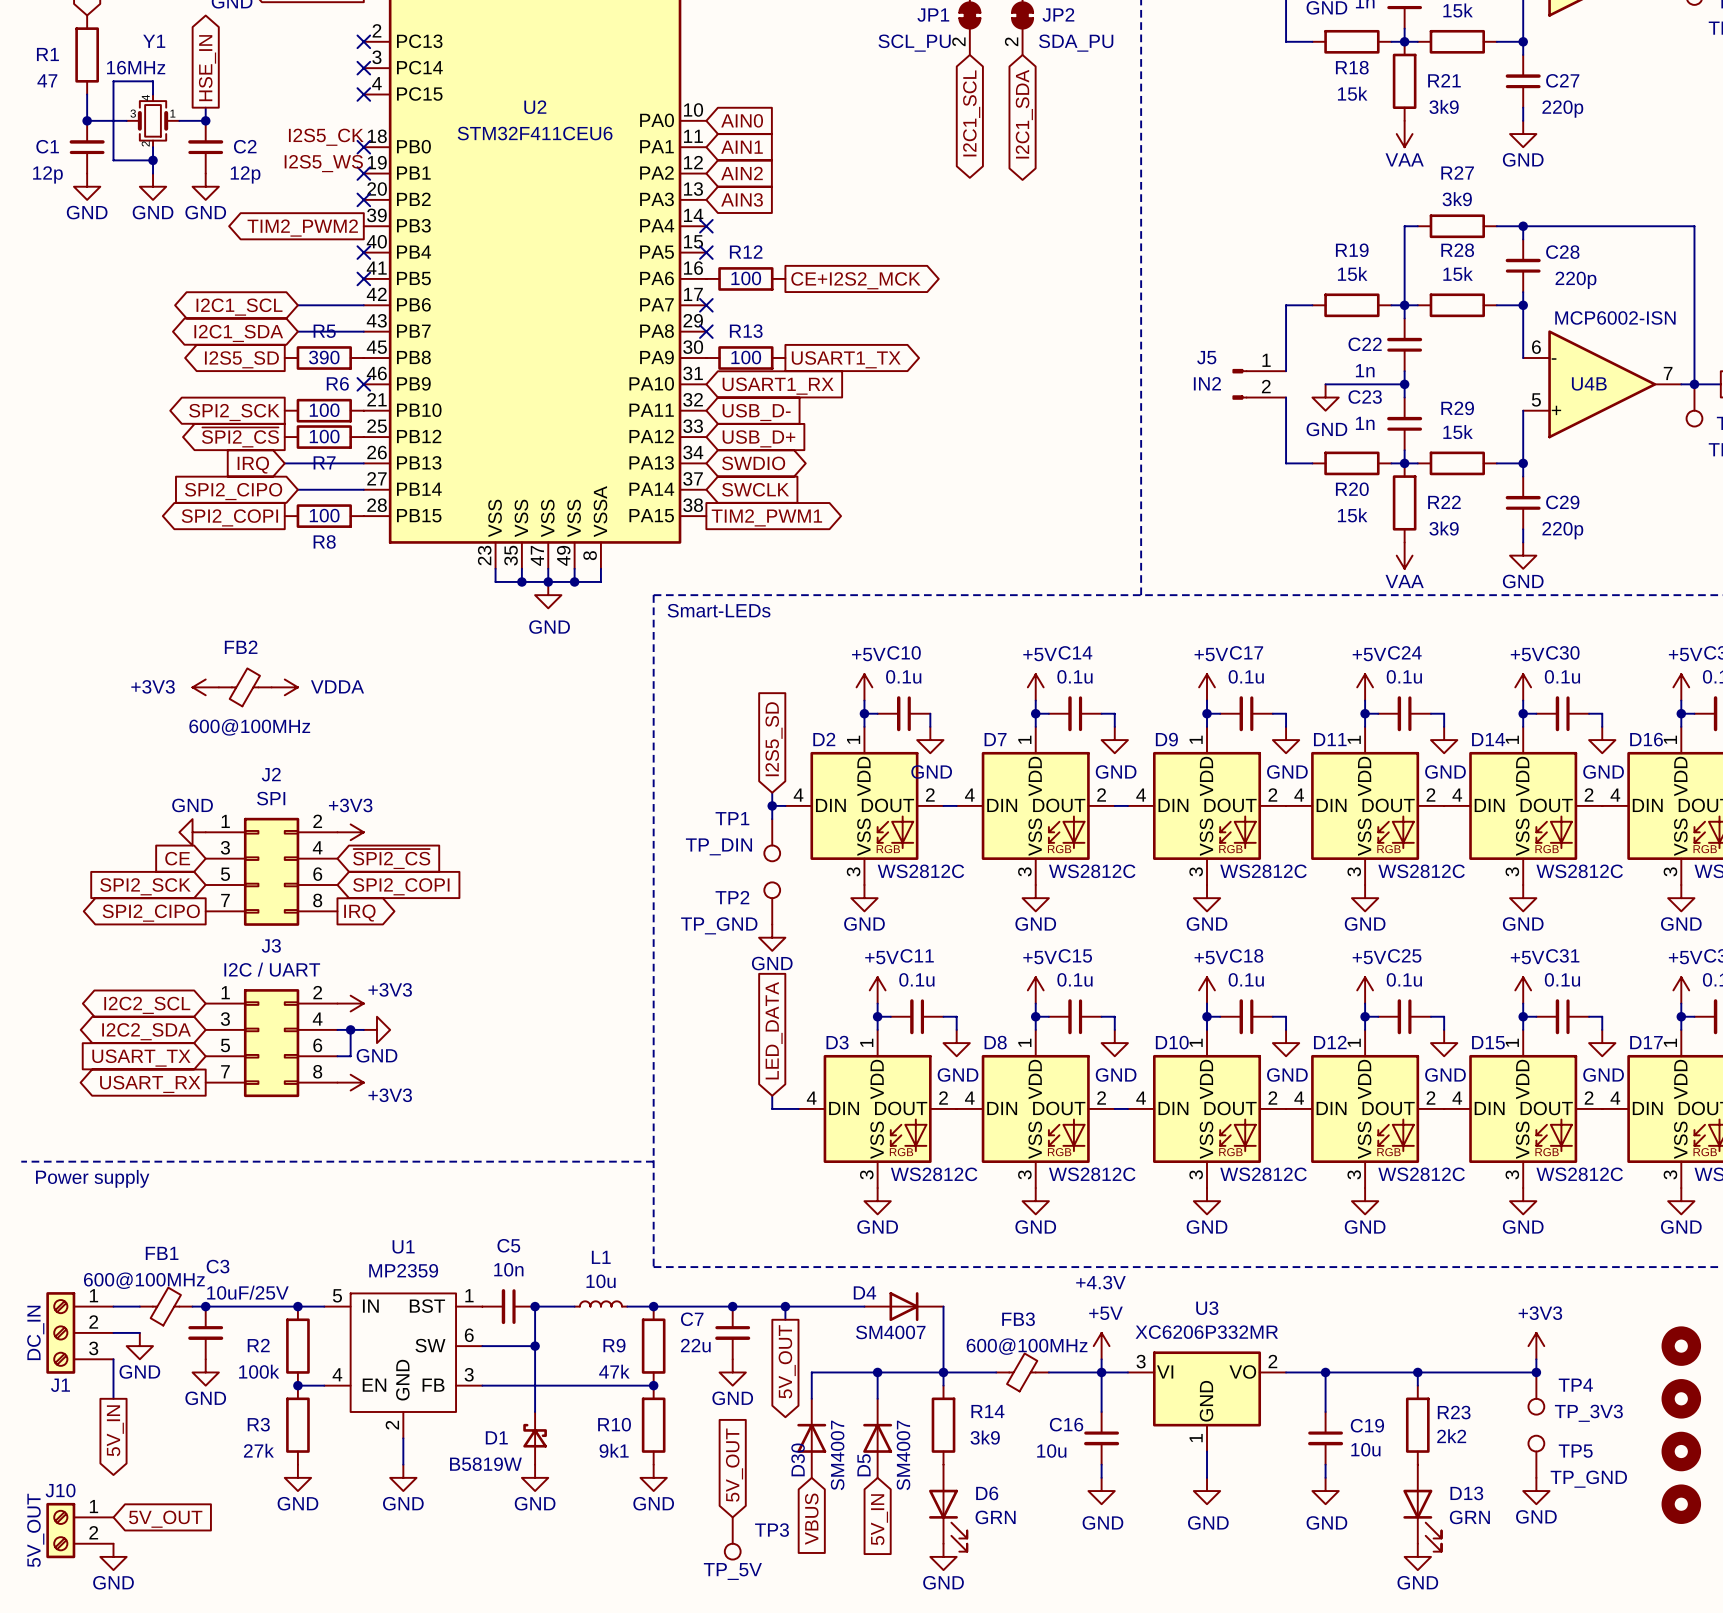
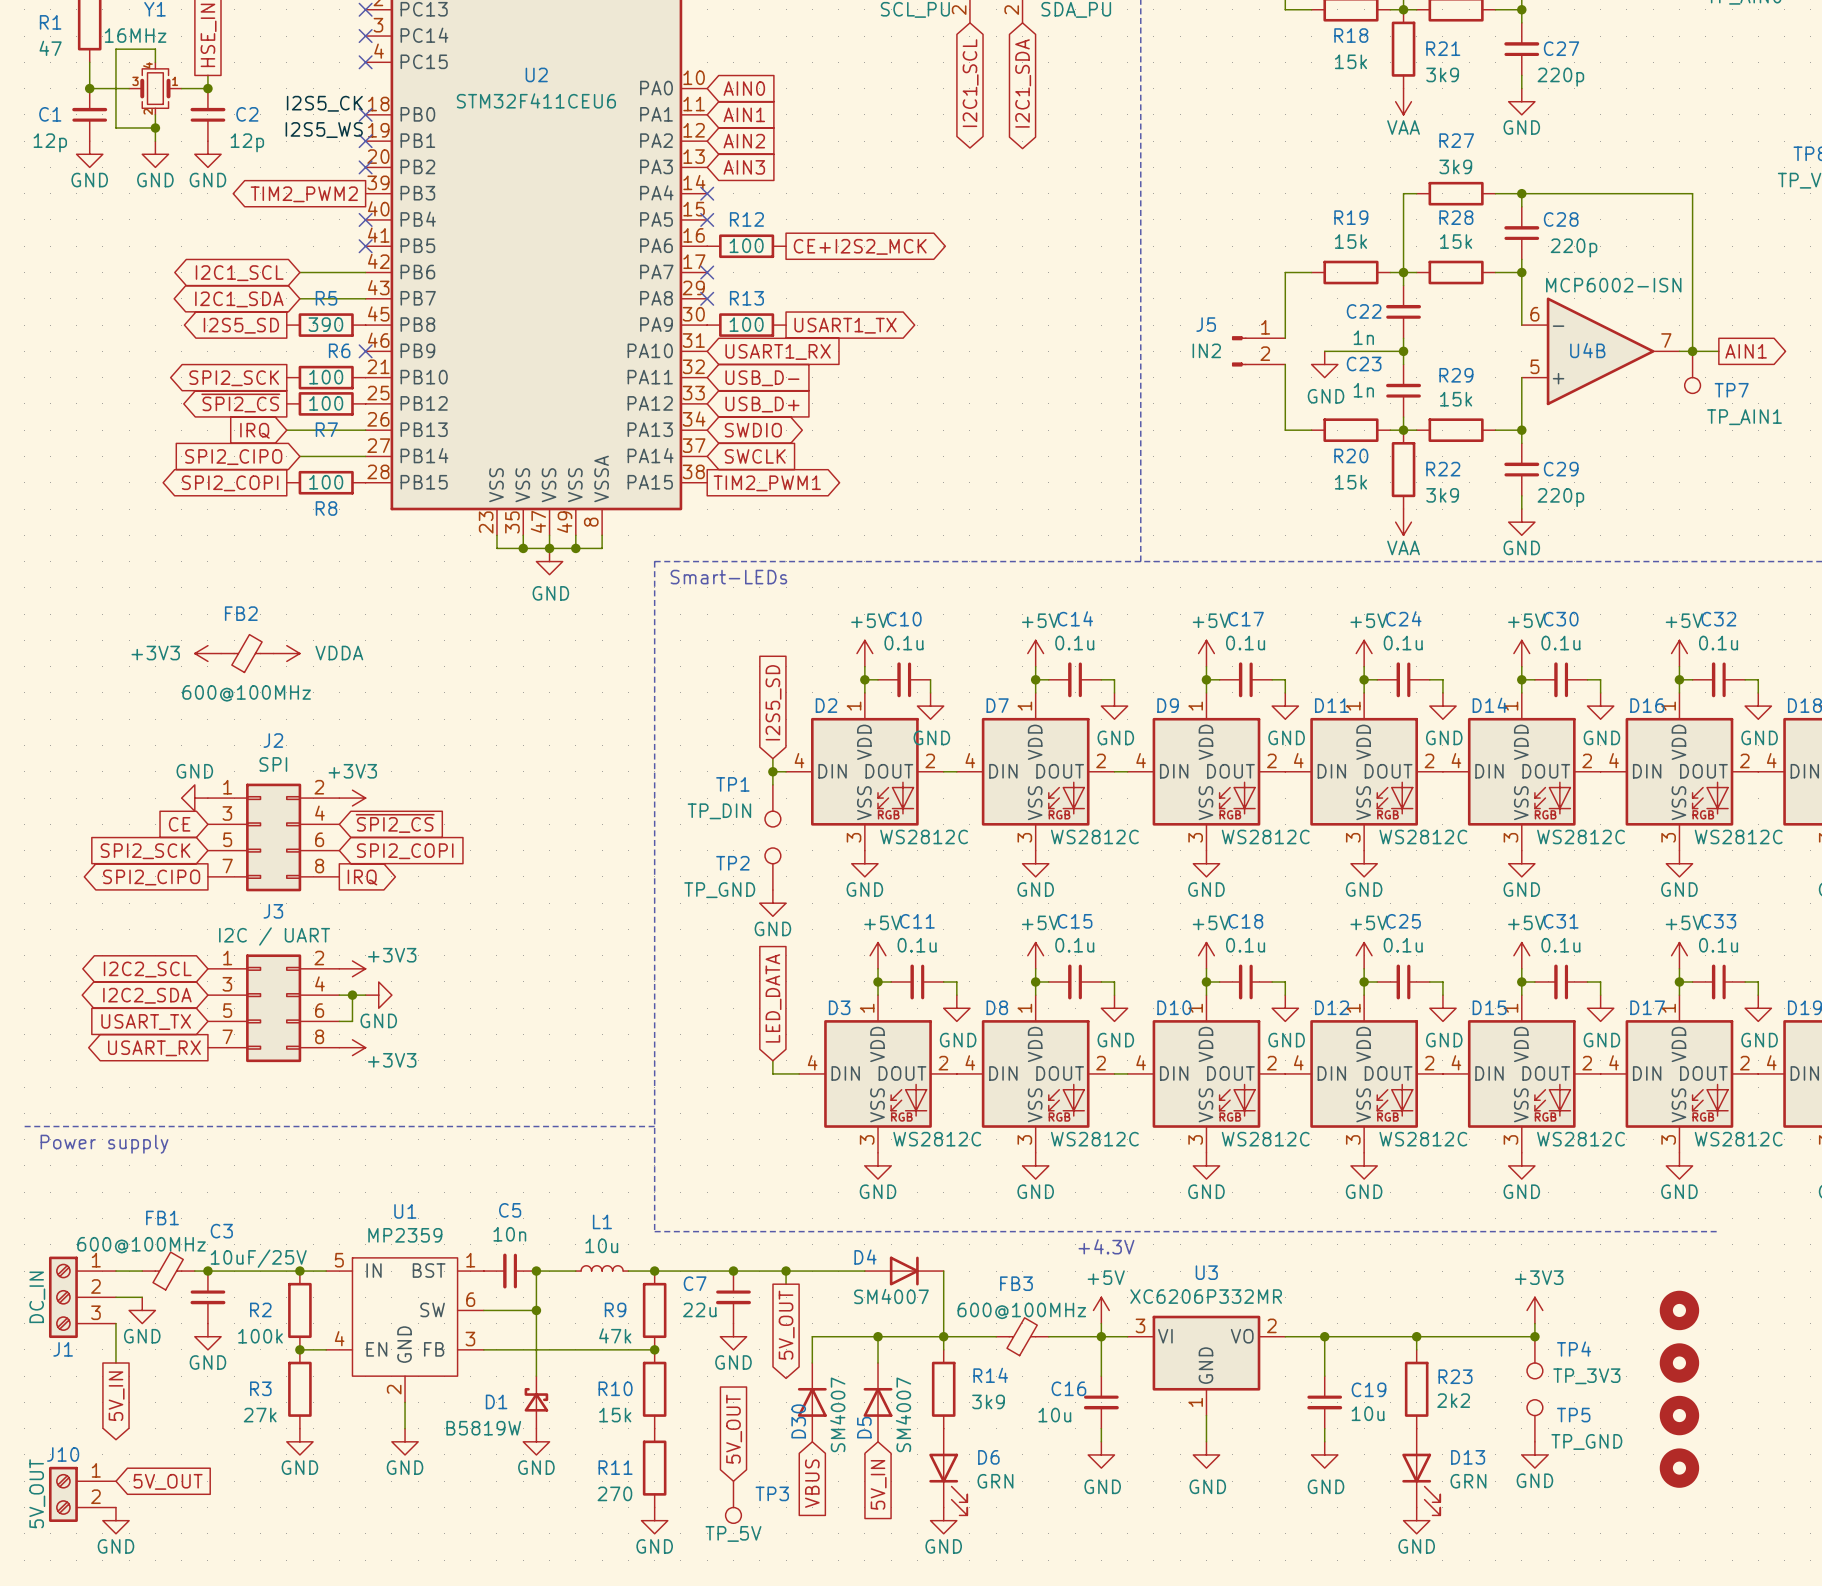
R10 value: 9k1 (614, 1450) -> 15k (615, 1415)
power symbol position: GND (653, 1477) -> GND (654, 1520)
R11: none -> 270 (654, 1468)

